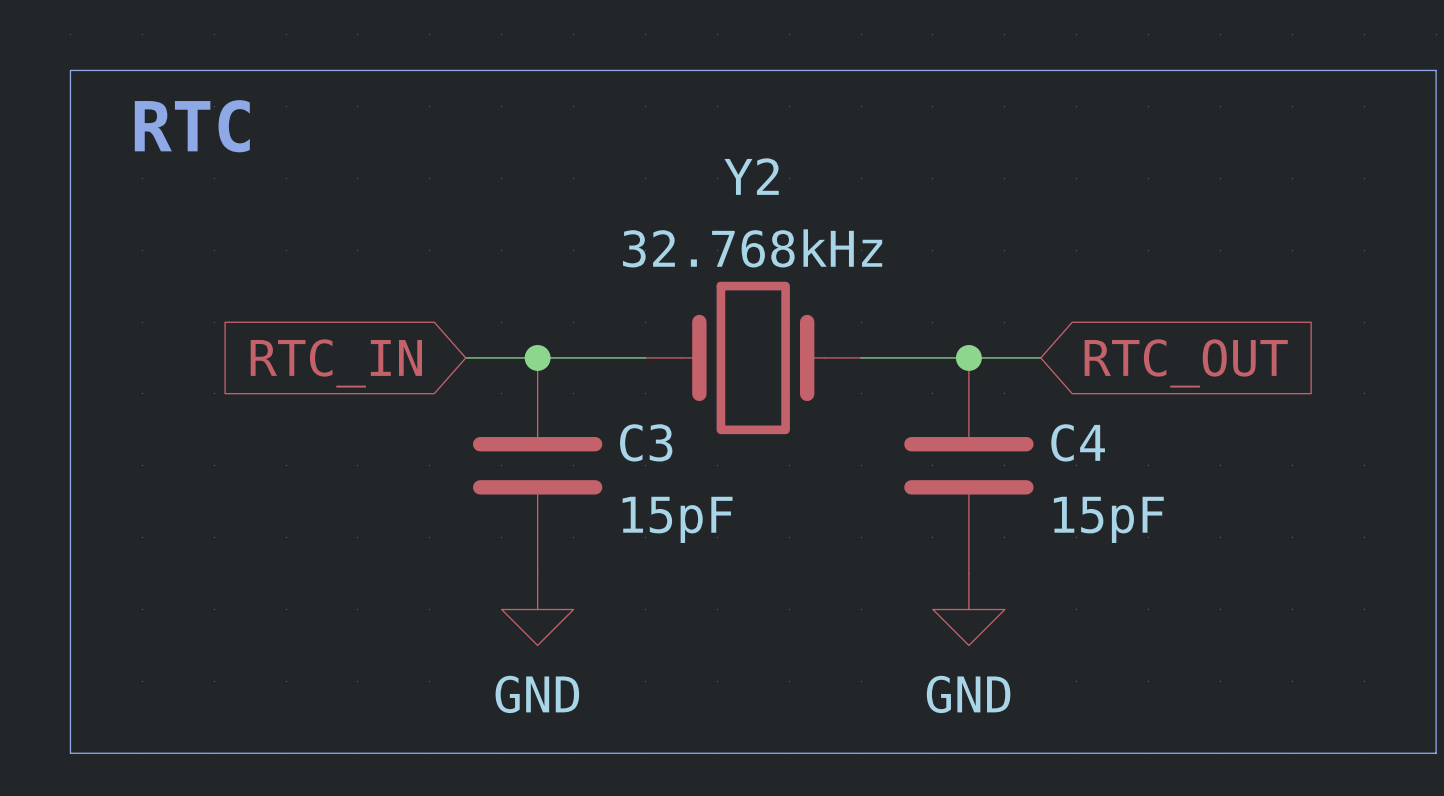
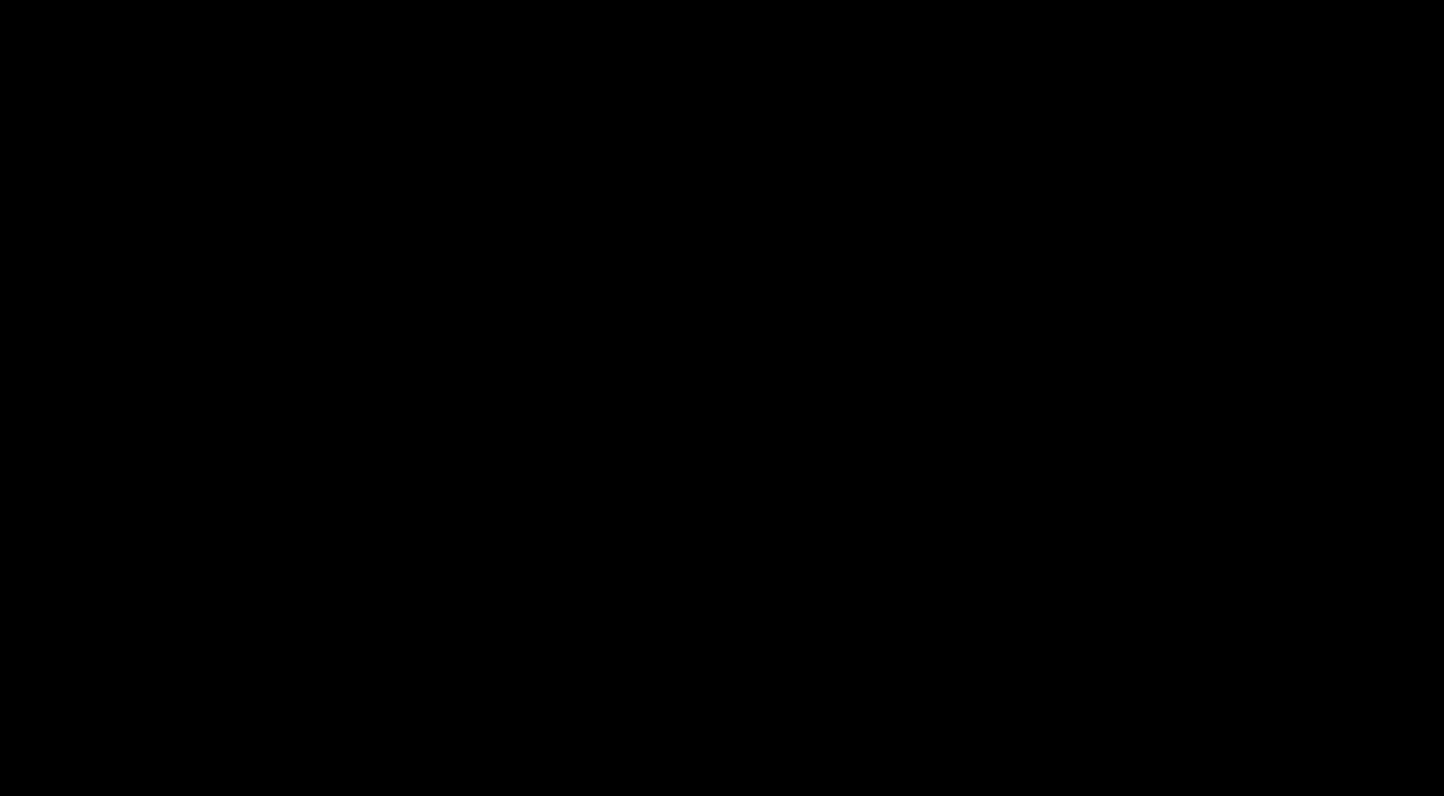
line: (70, 70) (1436, 70) (1436, 753) (70, 753) (70, 70) -> none
text: RTC (192, 126) -> none
wire: (465, 357) (645, 357) -> none
junction: (537, 357) -> none
Y2: 32.768kHz (753, 357) -> none
wire: (861, 357) (1040, 357) -> none
junction: (968, 357) -> none
global label: RTC_IN (336, 363) -> none
global label: RTC_OUT (1186, 363) -> none
C3: 15pF (537, 465) -> none
C4: 15pF (968, 465) -> none
power symbol: GND (537, 609) -> none
power symbol: GND (968, 609) -> none

